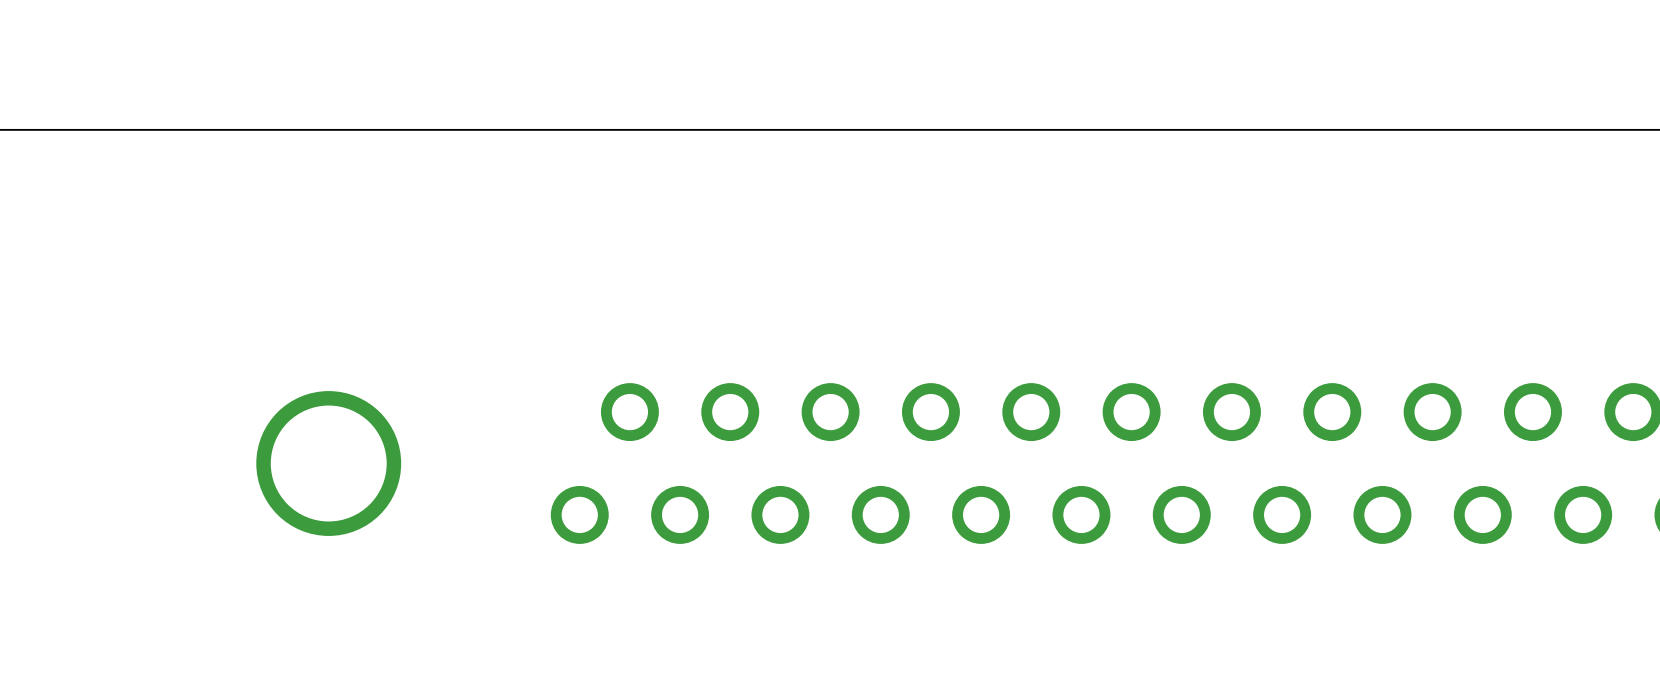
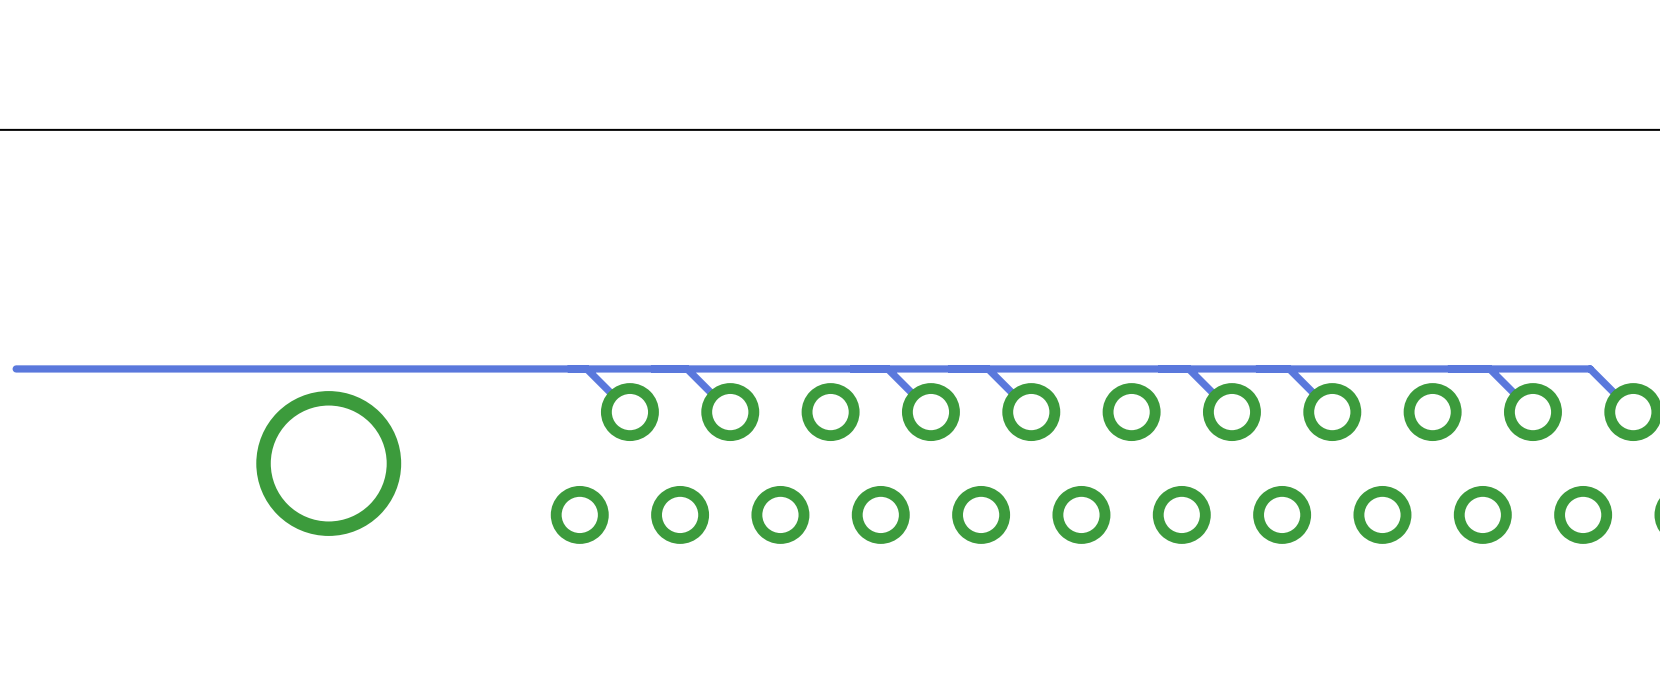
track: none -> (16, 368) (1590, 368) (1633, 412)
track: none -> (586, 368) (629, 412)
track: none -> (687, 368) (730, 412)
track: none -> (887, 368) (930, 412)
track: none -> (988, 368) (1031, 412)
track: none -> (1188, 368) (1231, 412)
track: none -> (1289, 368) (1332, 412)
track: none -> (1489, 368) (1532, 412)

